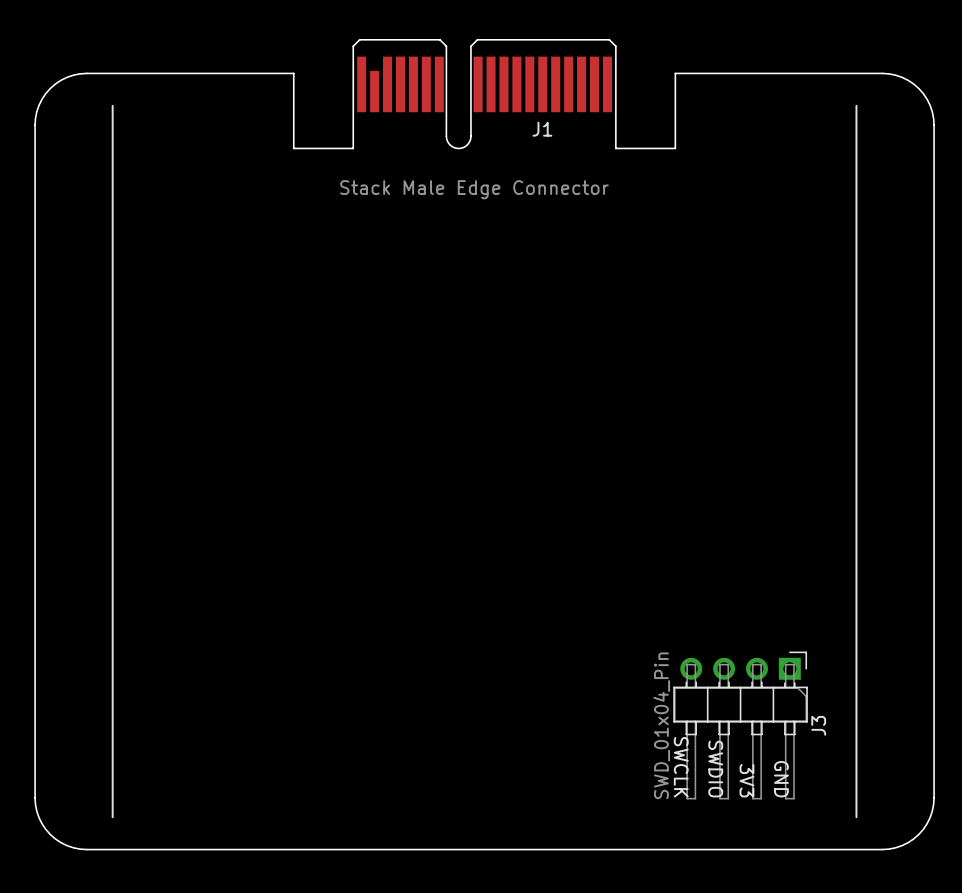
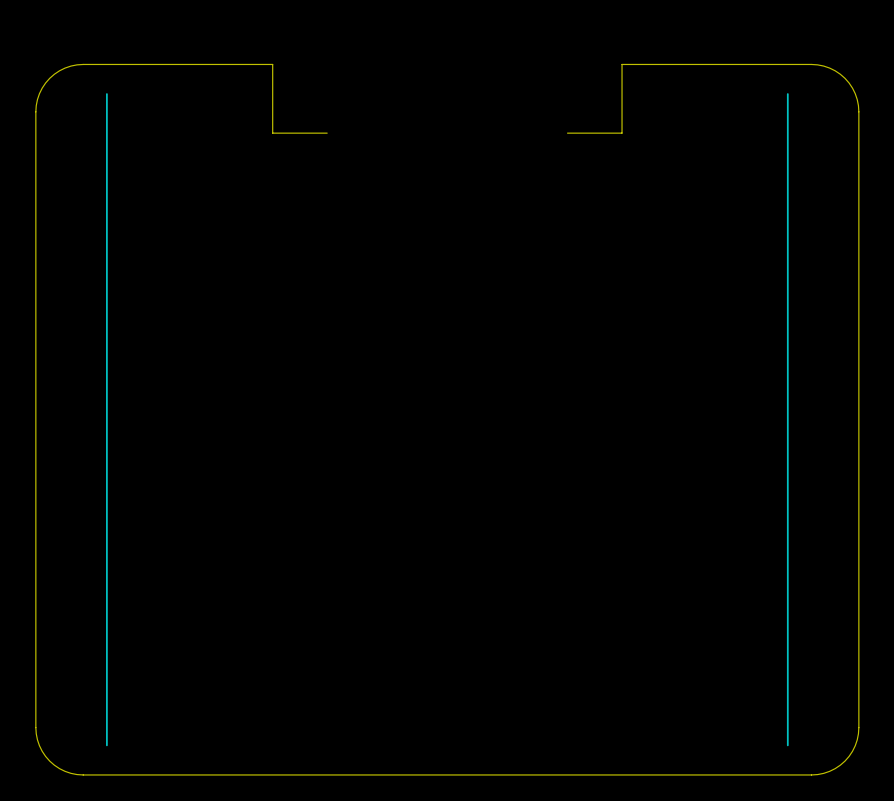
J1: Stack Male Edge Connector (484, 94) -> none
J3: SWD_01x04_Pin (740, 725) -> none

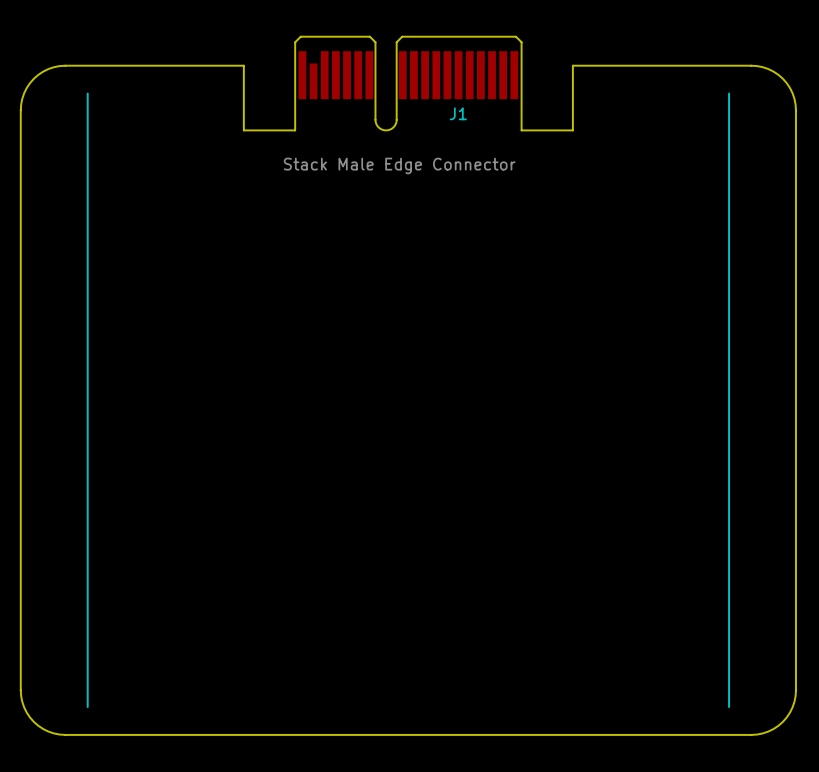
J1: none -> Stack Male Edge Connector (408, 83)

